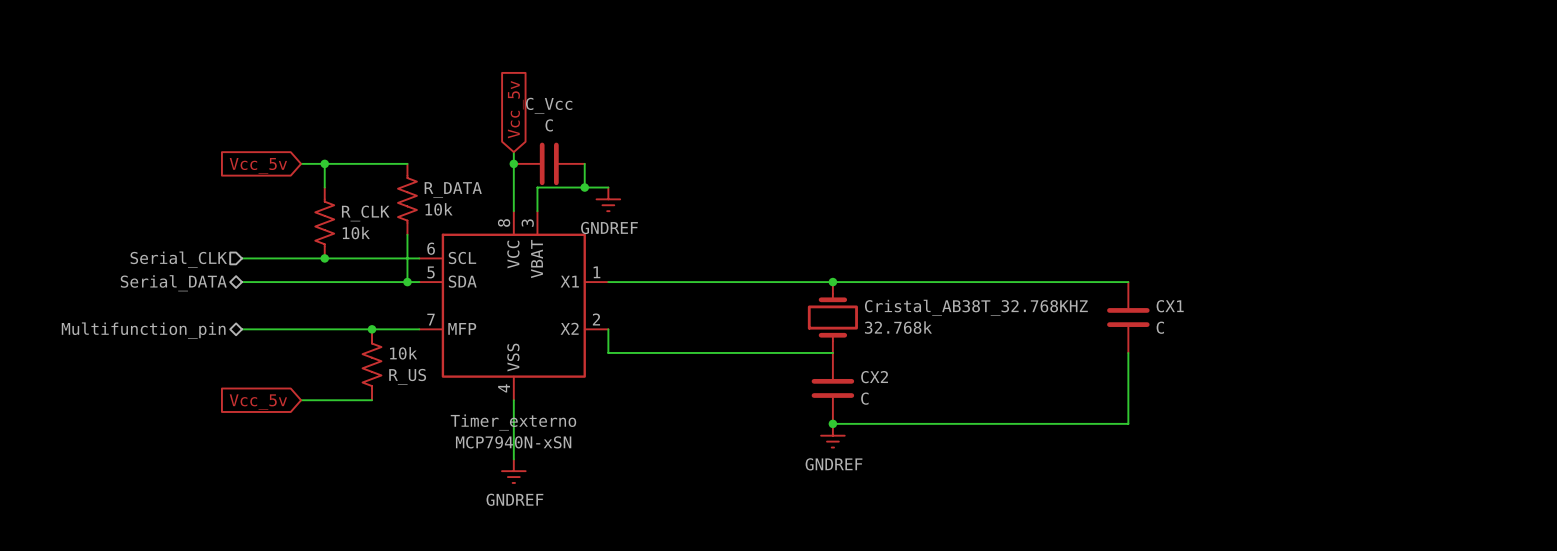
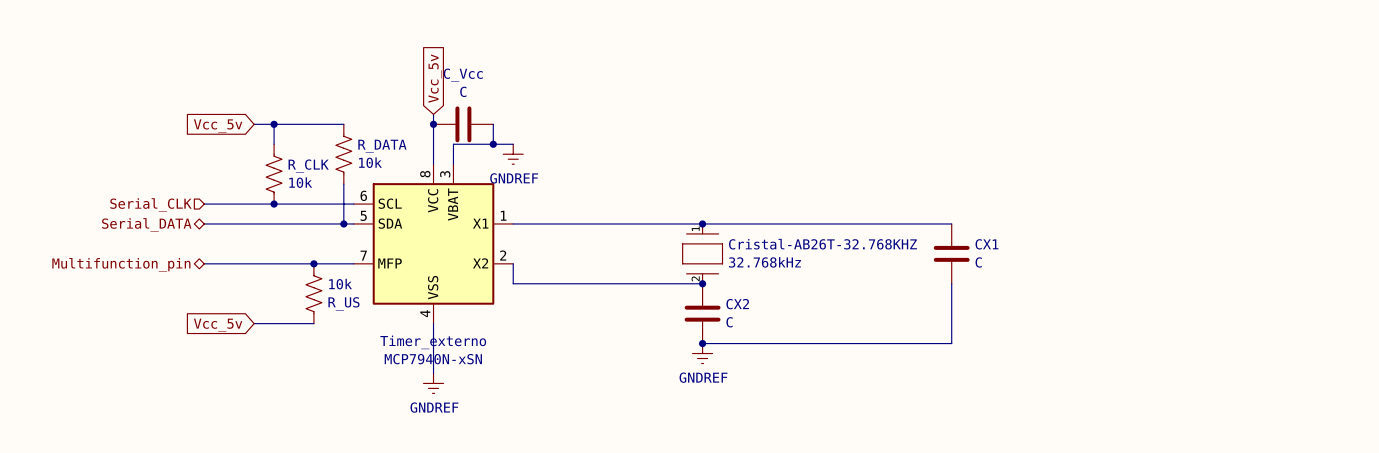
Cristal_AB38T_32.768KHZ: 32.768k (832, 317) -> none
Cristal-AB26T-32.768KHZ: none -> 32.768kHz (702, 253)
junction: none -> (702, 283)

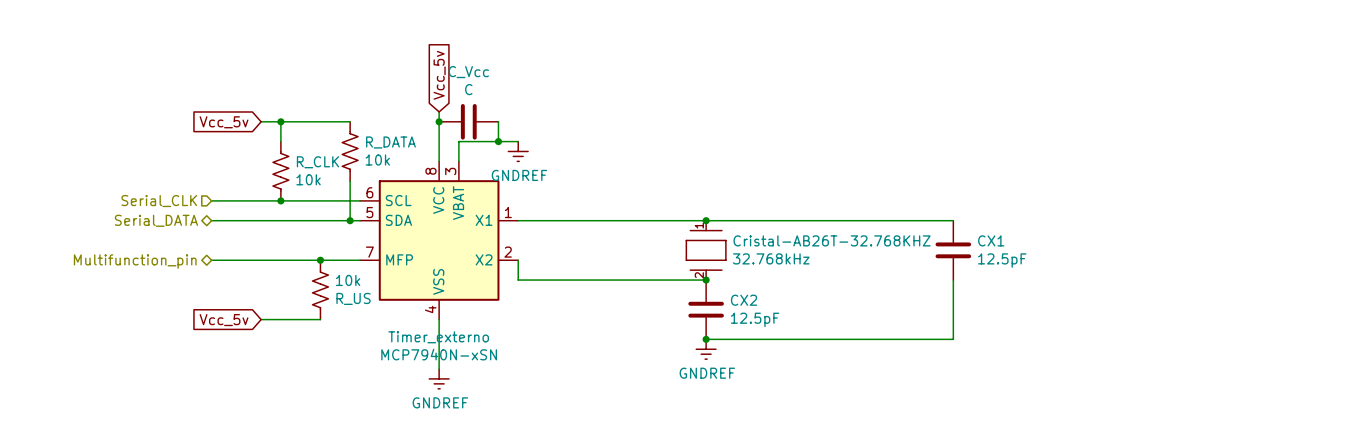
CX1 value: C (978, 262) -> 12.5pF (1002, 260)
CX2 value: C (729, 322) -> 12.5pF (755, 319)

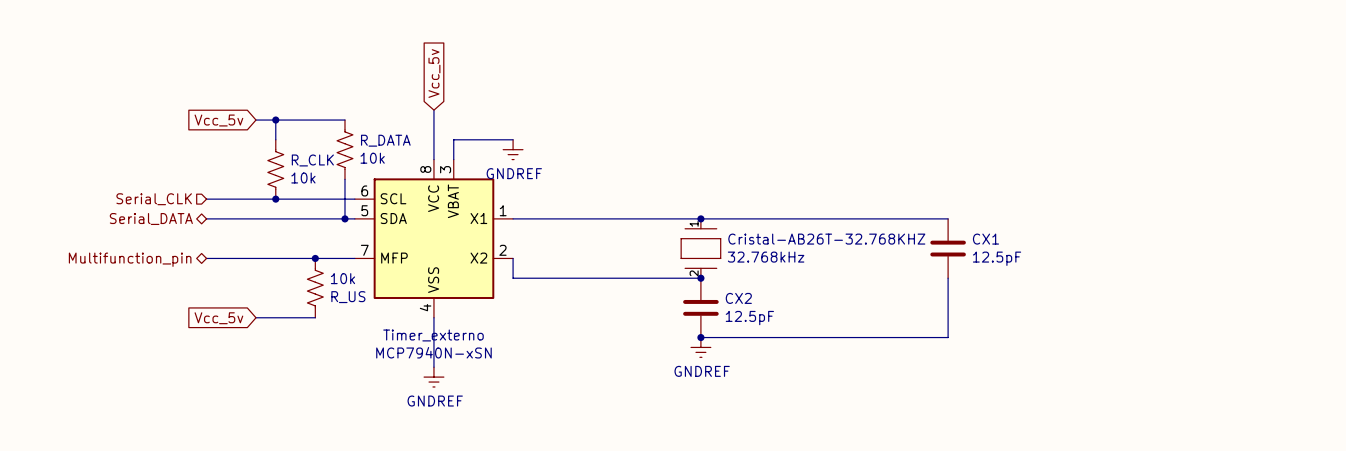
junction: (439, 121) -> none
C_Vcc: C (468, 121) -> none
wire: (498, 121) (498, 141) -> none
junction: (498, 141) -> none

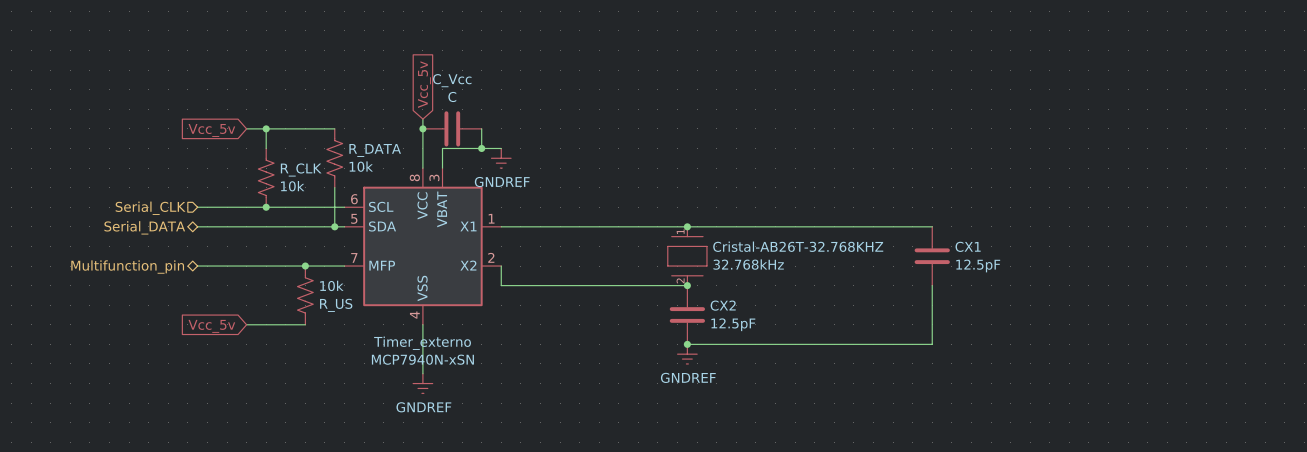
junction: none -> (422, 128)
C_Vcc: none -> C (452, 128)
wire: none -> (481, 128) (481, 148)
junction: none -> (481, 148)

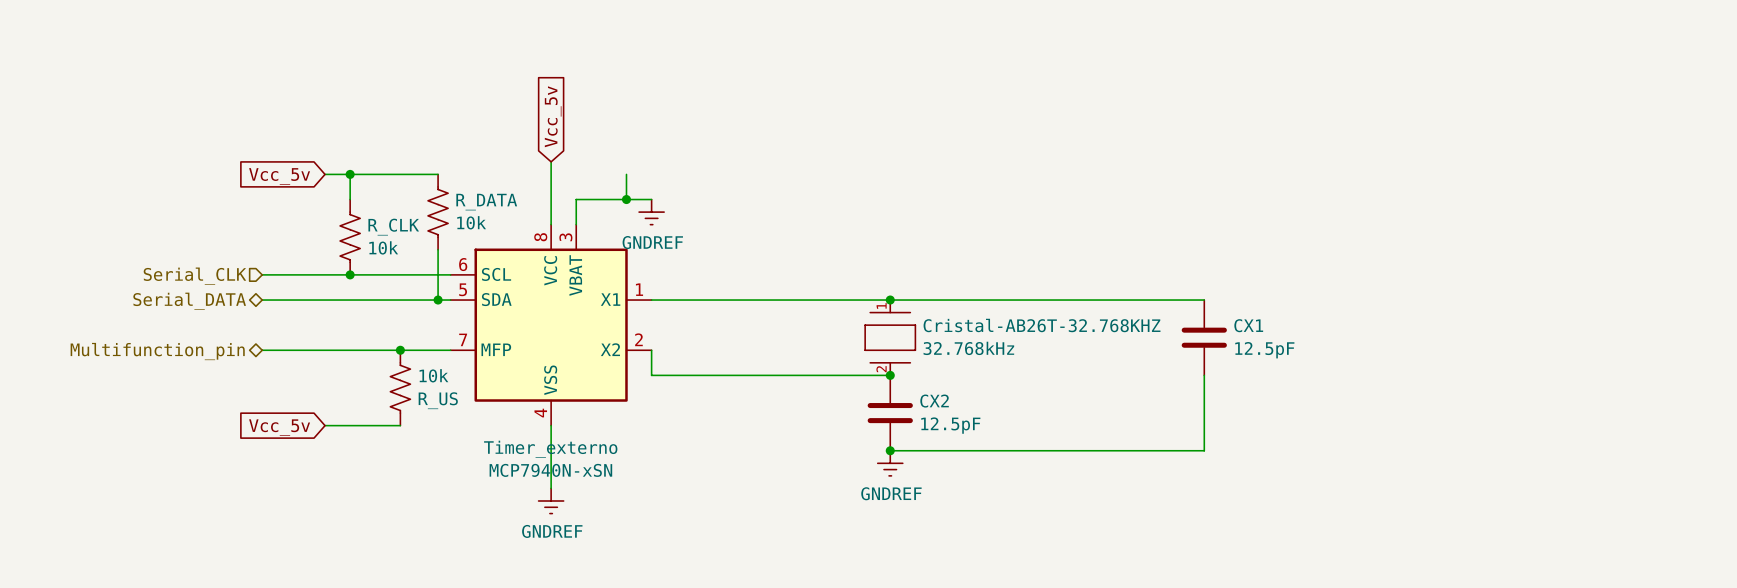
junction: (422, 128) -> none
C_Vcc: C (452, 128) -> none

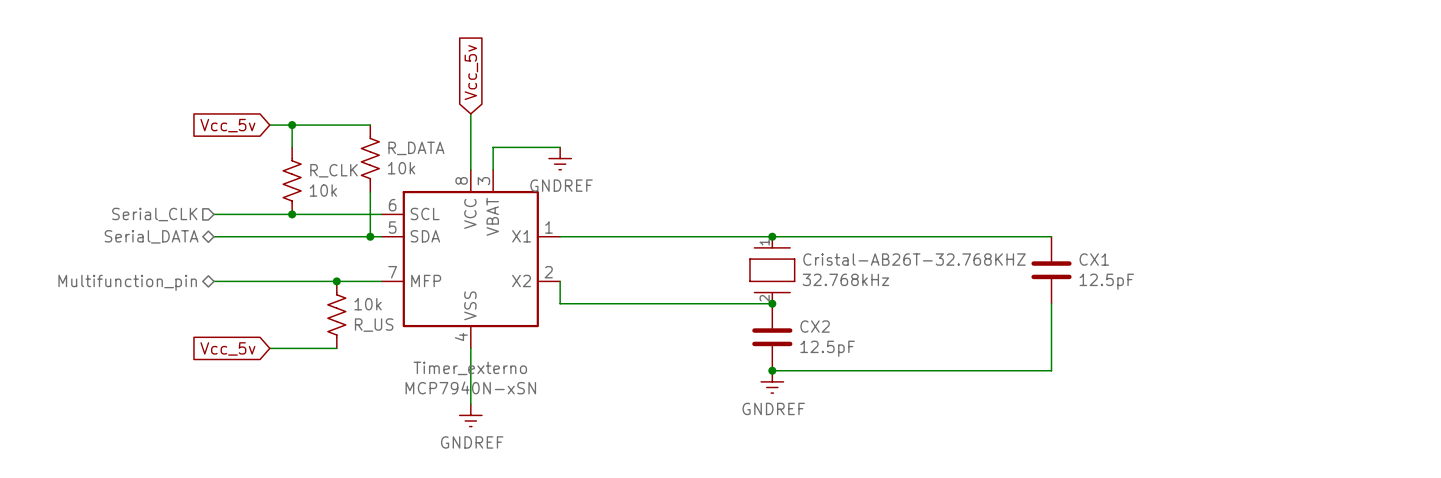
wire: (626, 174) (626, 199) -> none
junction: (626, 199) -> none

